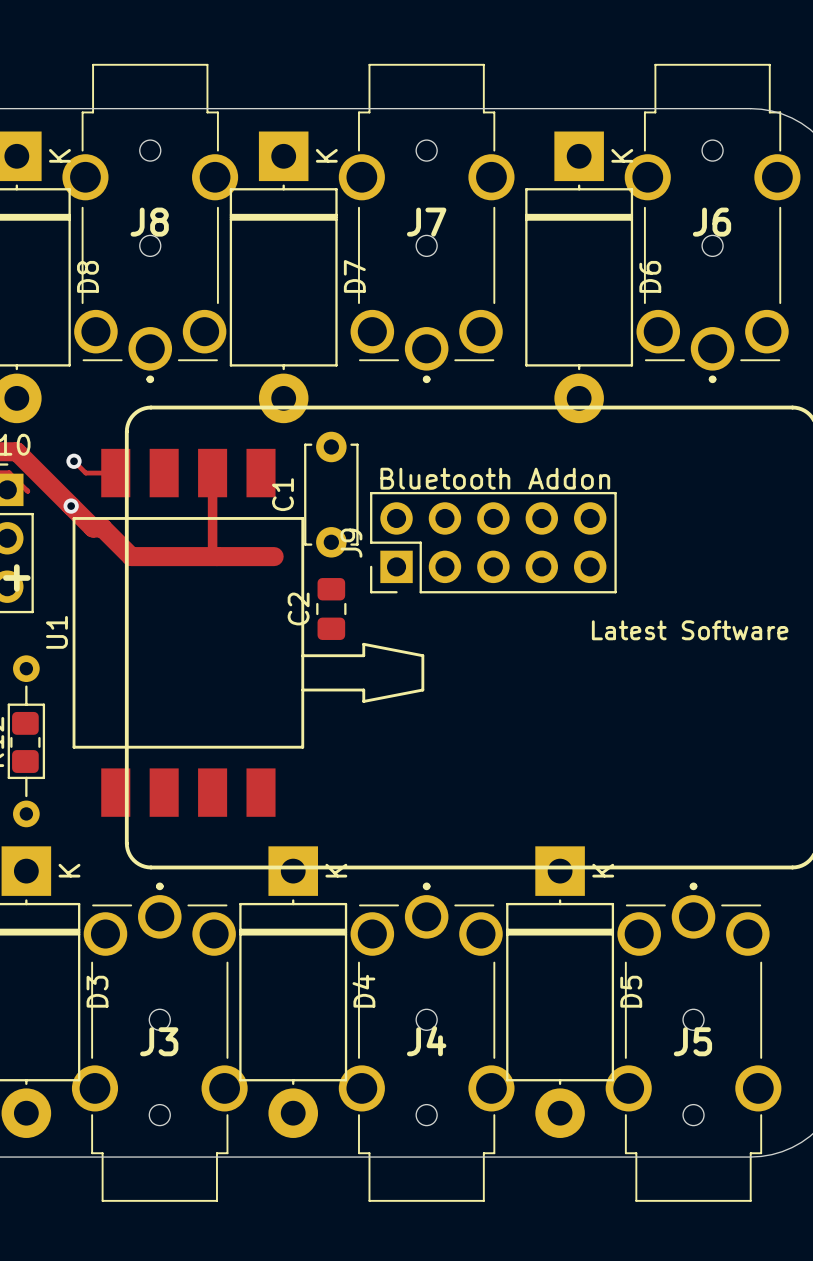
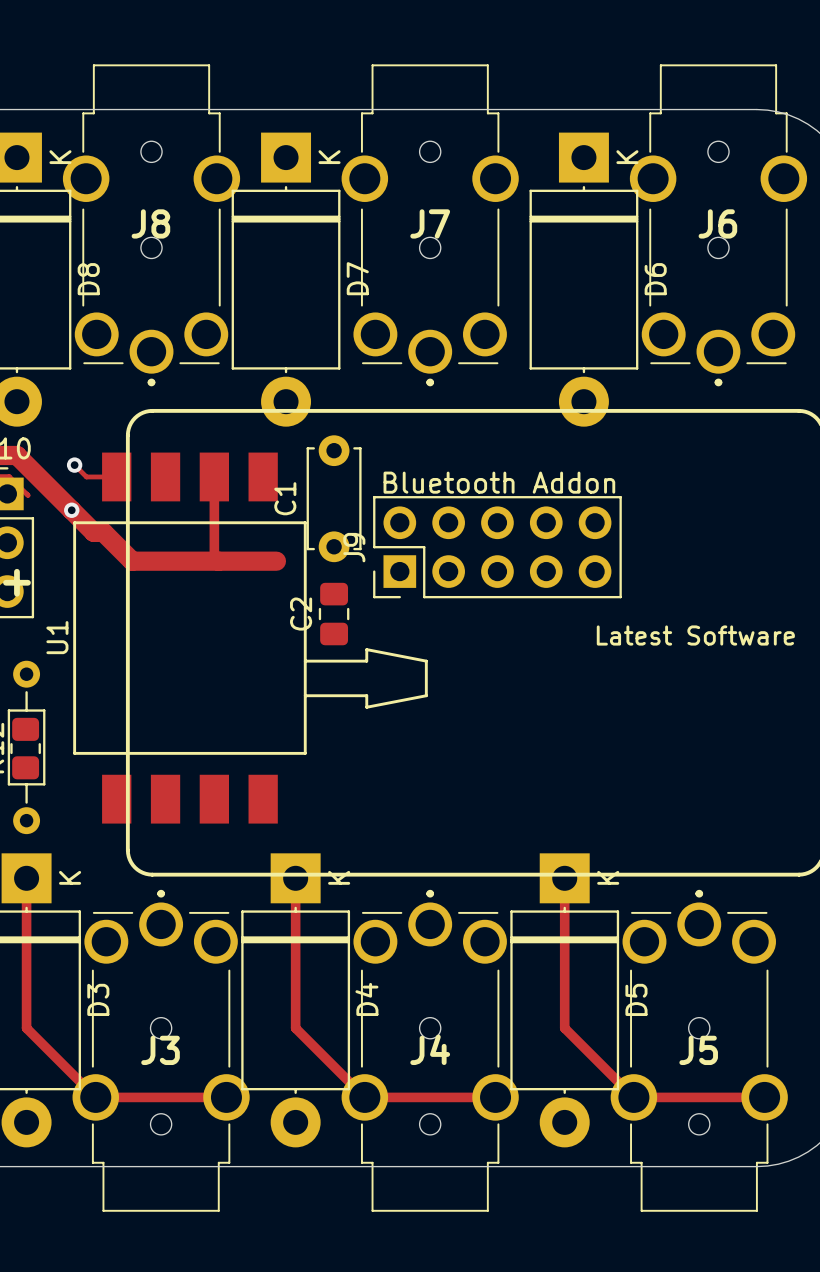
track: none -> (26, 878) (26, 1028) (95, 1097) (226, 1097)
track: none -> (295, 878) (295, 1028) (364, 1097) (495, 1097)
track: none -> (564, 878) (564, 1028) (633, 1097) (764, 1097)

